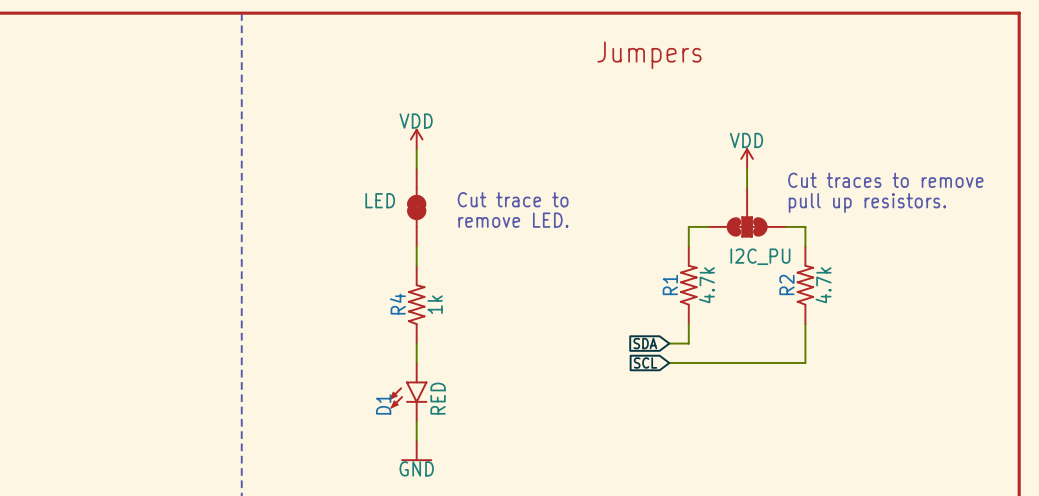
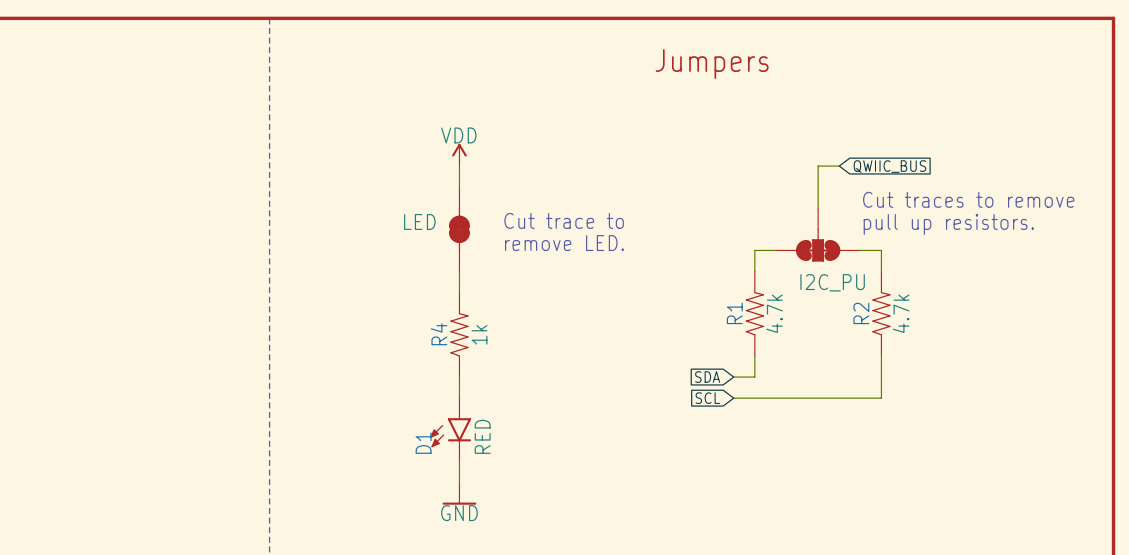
global label: none -> QWIIC_BUS (889, 166)
power symbol: VDD (747, 158) -> none

